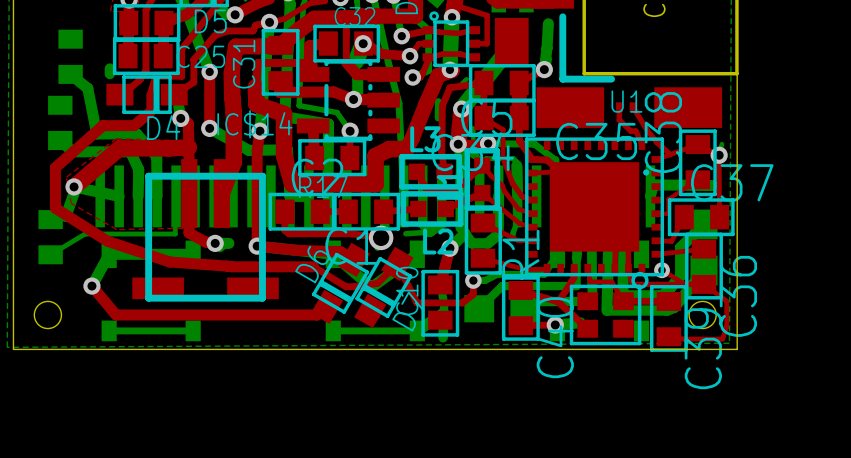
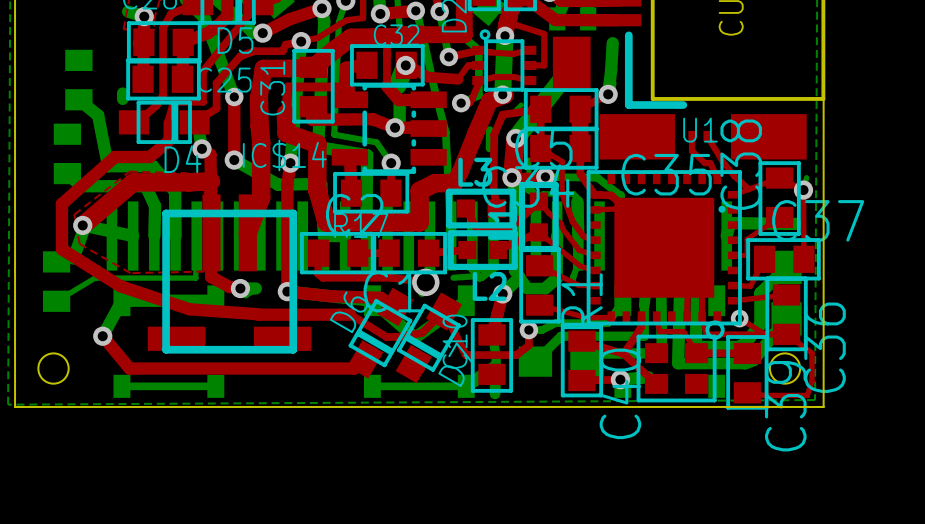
via: (410, 56) -> none

